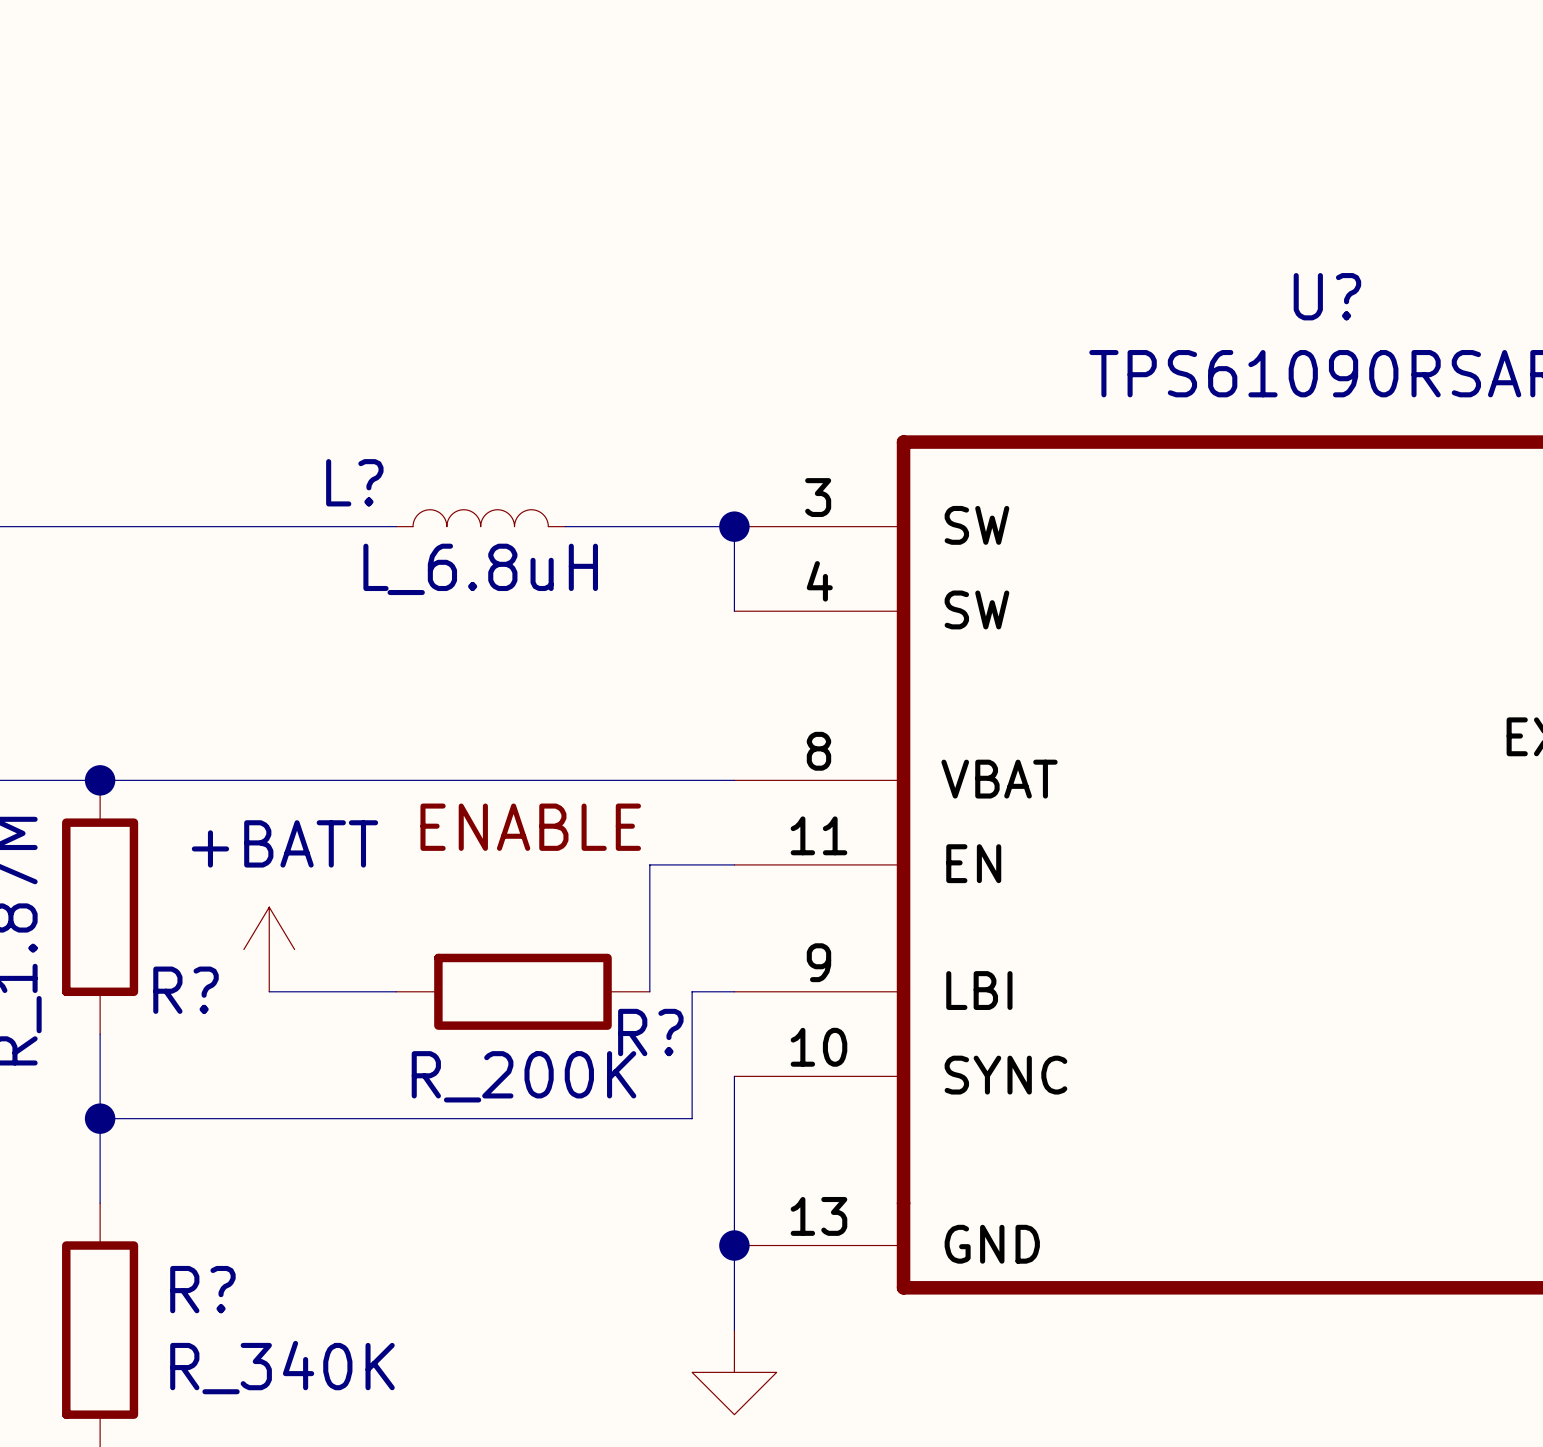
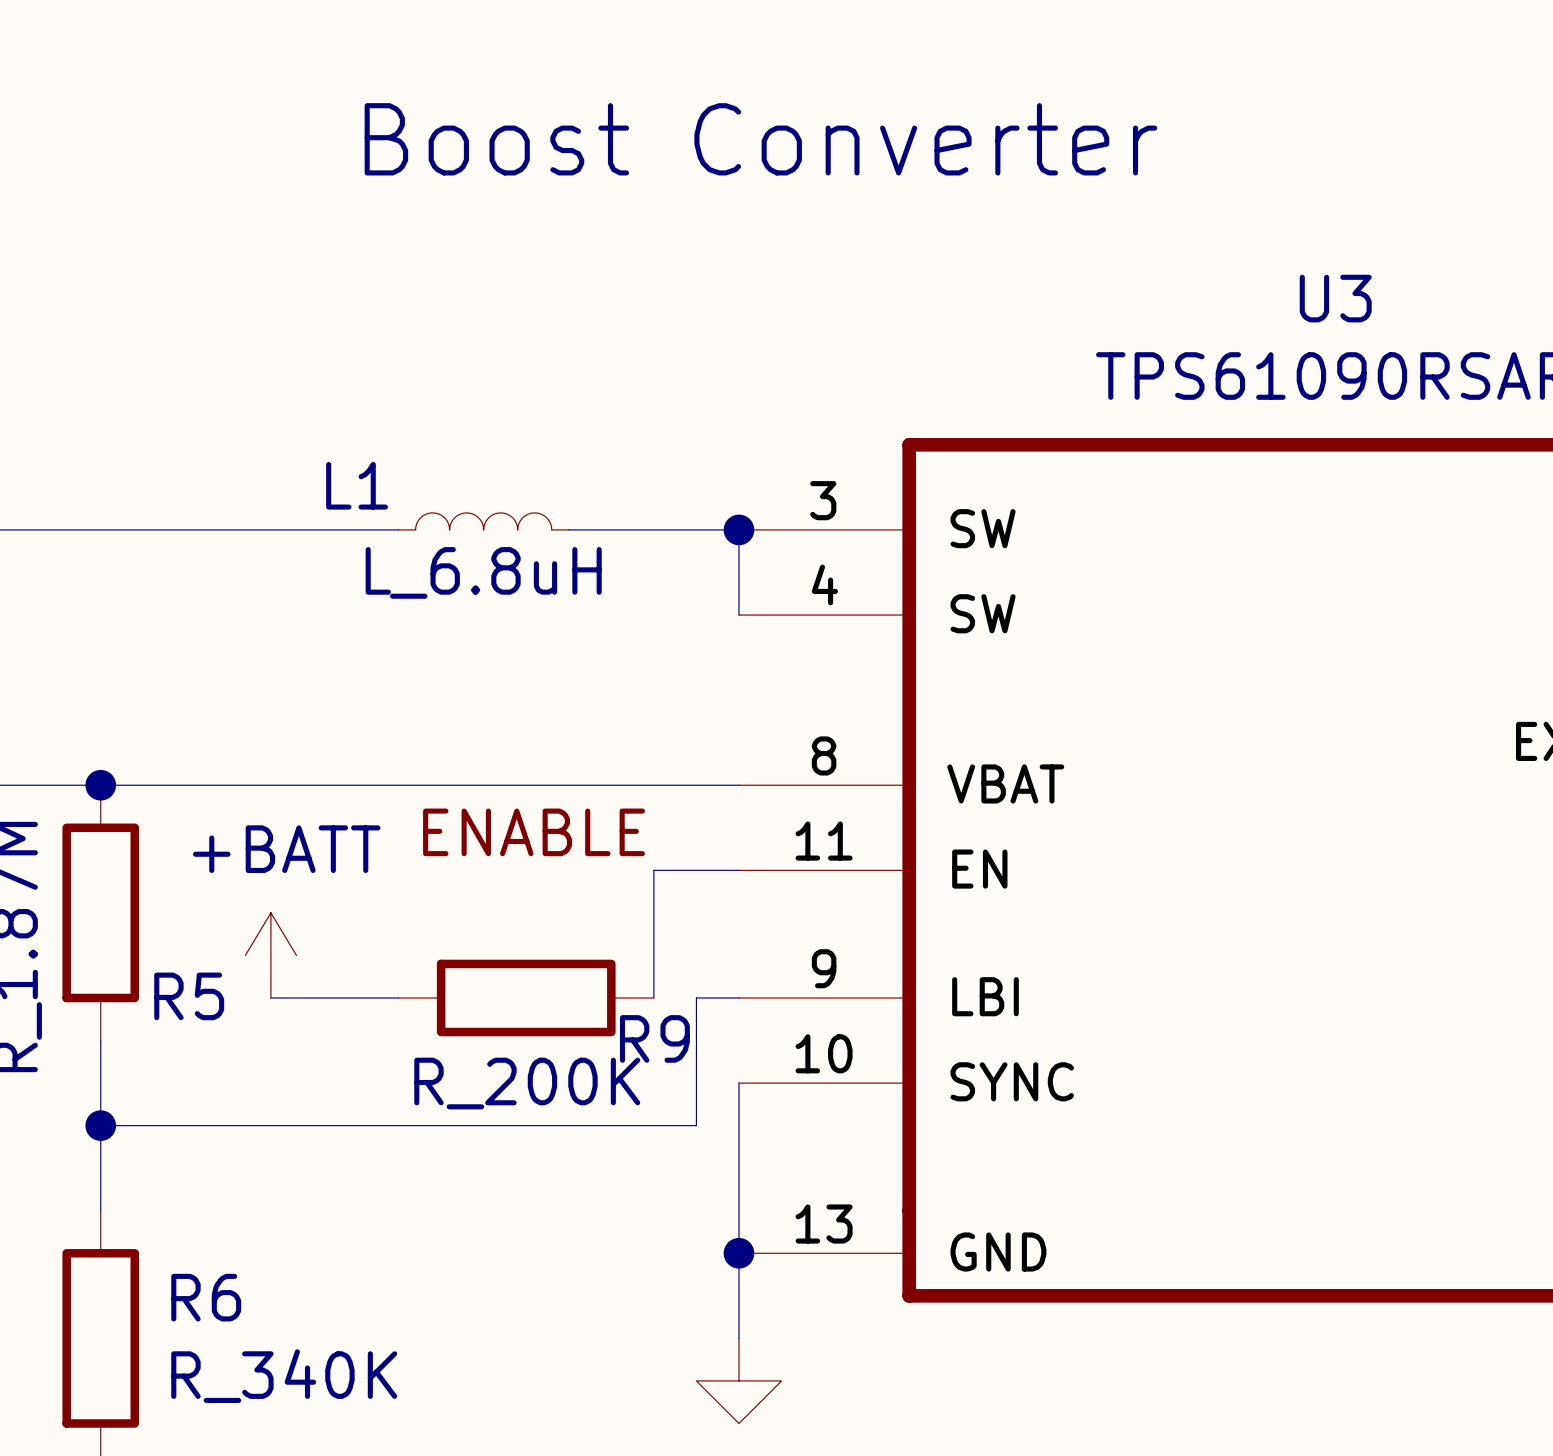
text: none -> Boost Converter (760, 139)
U? name: U? (1327, 296) -> U3 (1335, 298)
L? name: L? (354, 482) -> L1 (357, 485)
R? name: R? (186, 990) -> R5 (189, 996)
R? name: R? (650, 1032) -> R9 (654, 1038)
R? name: R? (202, 1289) -> R6 (206, 1297)

